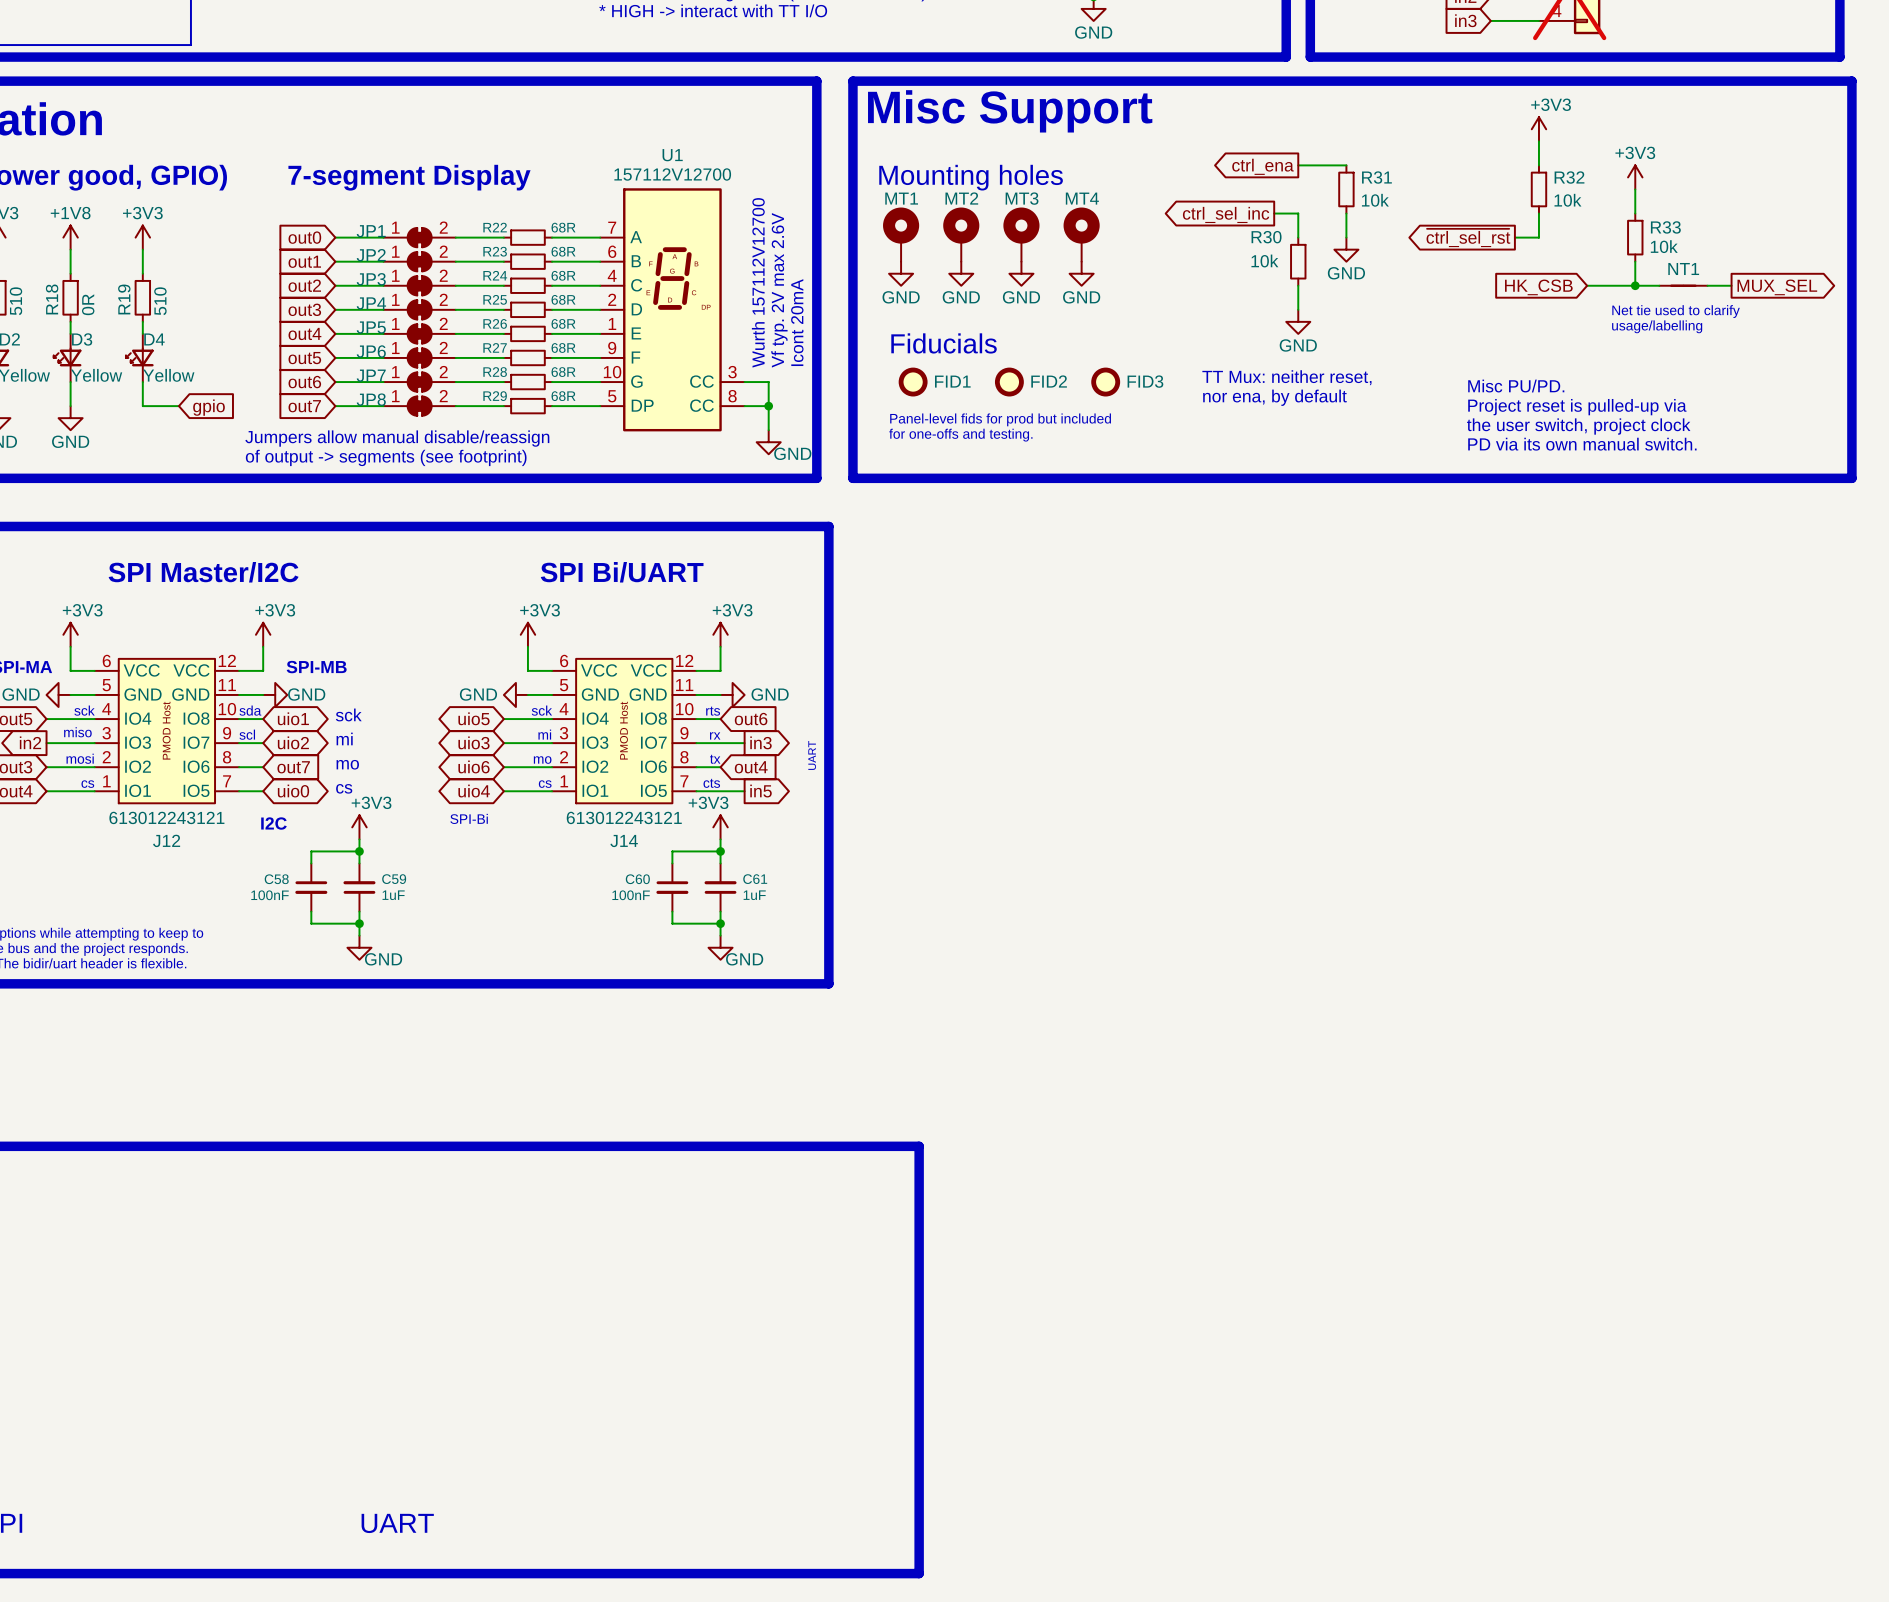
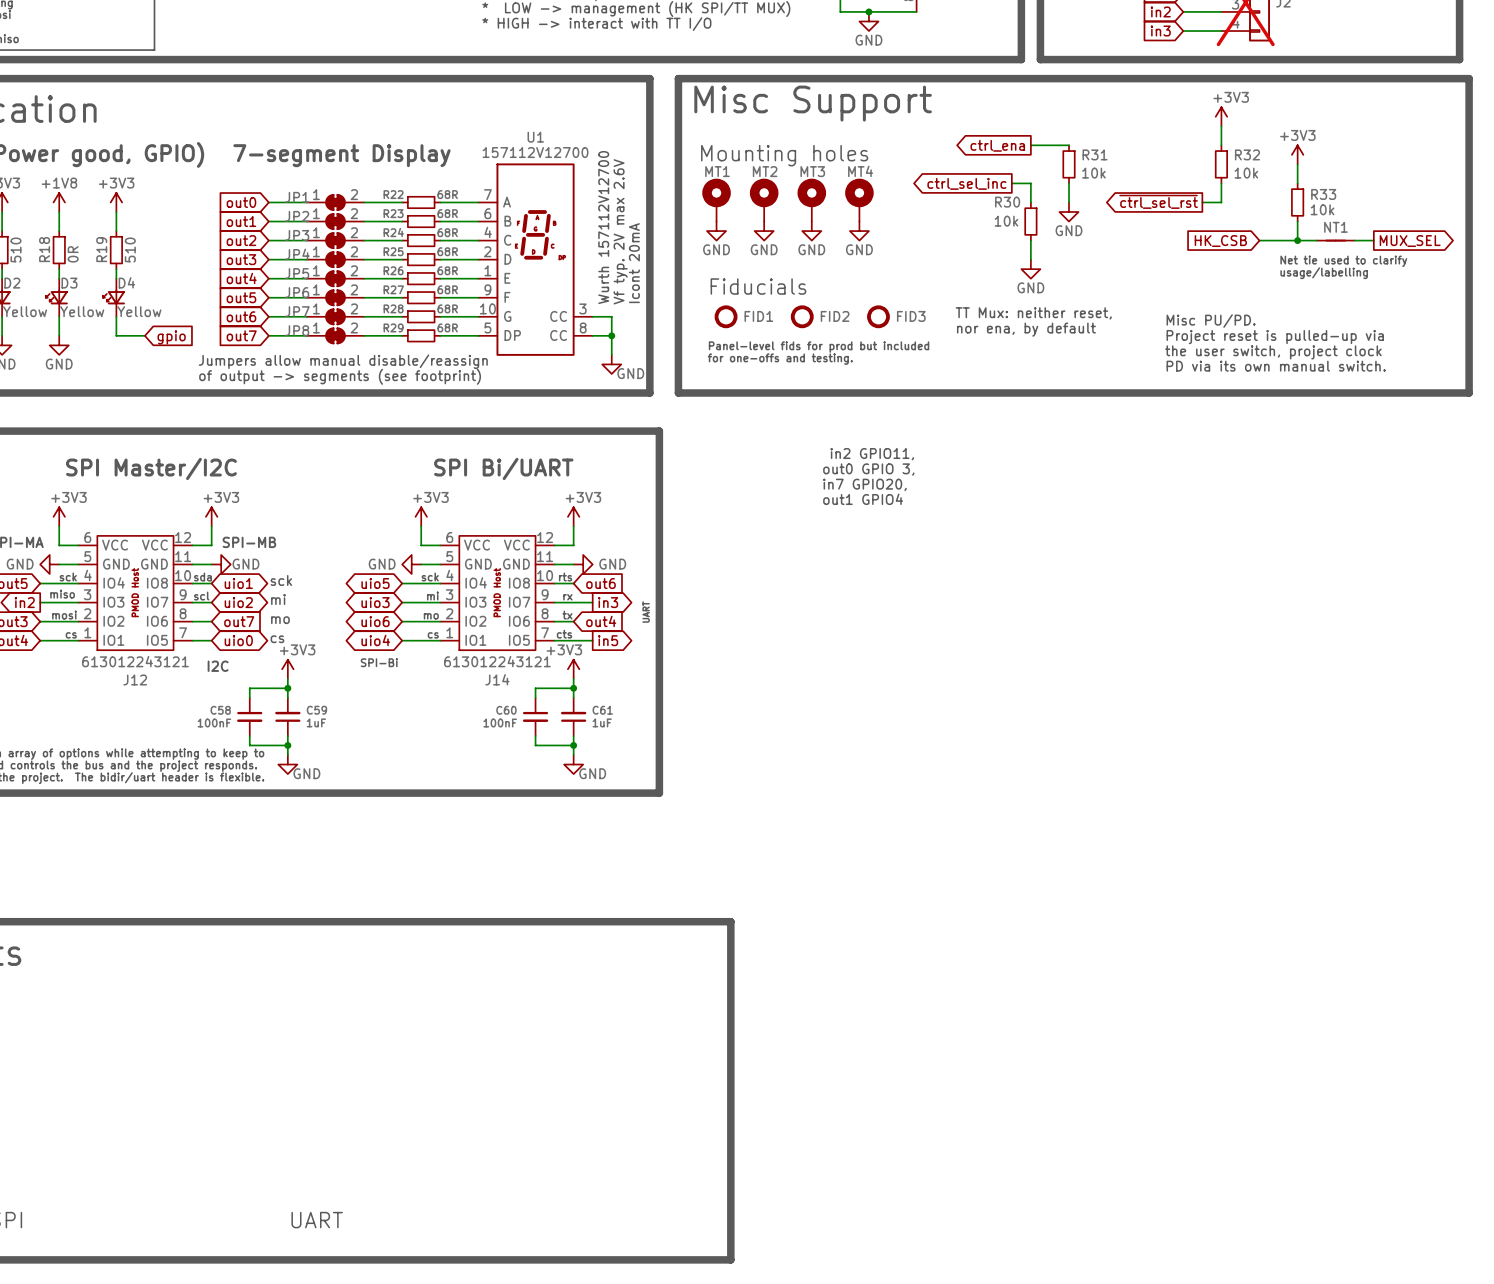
text: none -> in2 GPIO11, (872, 454)
text: none -> out0 GPIO 3, (868, 469)
text: none -> in7 GPIO20, (864, 484)
text: none -> out1 GPIO4 (863, 499)

